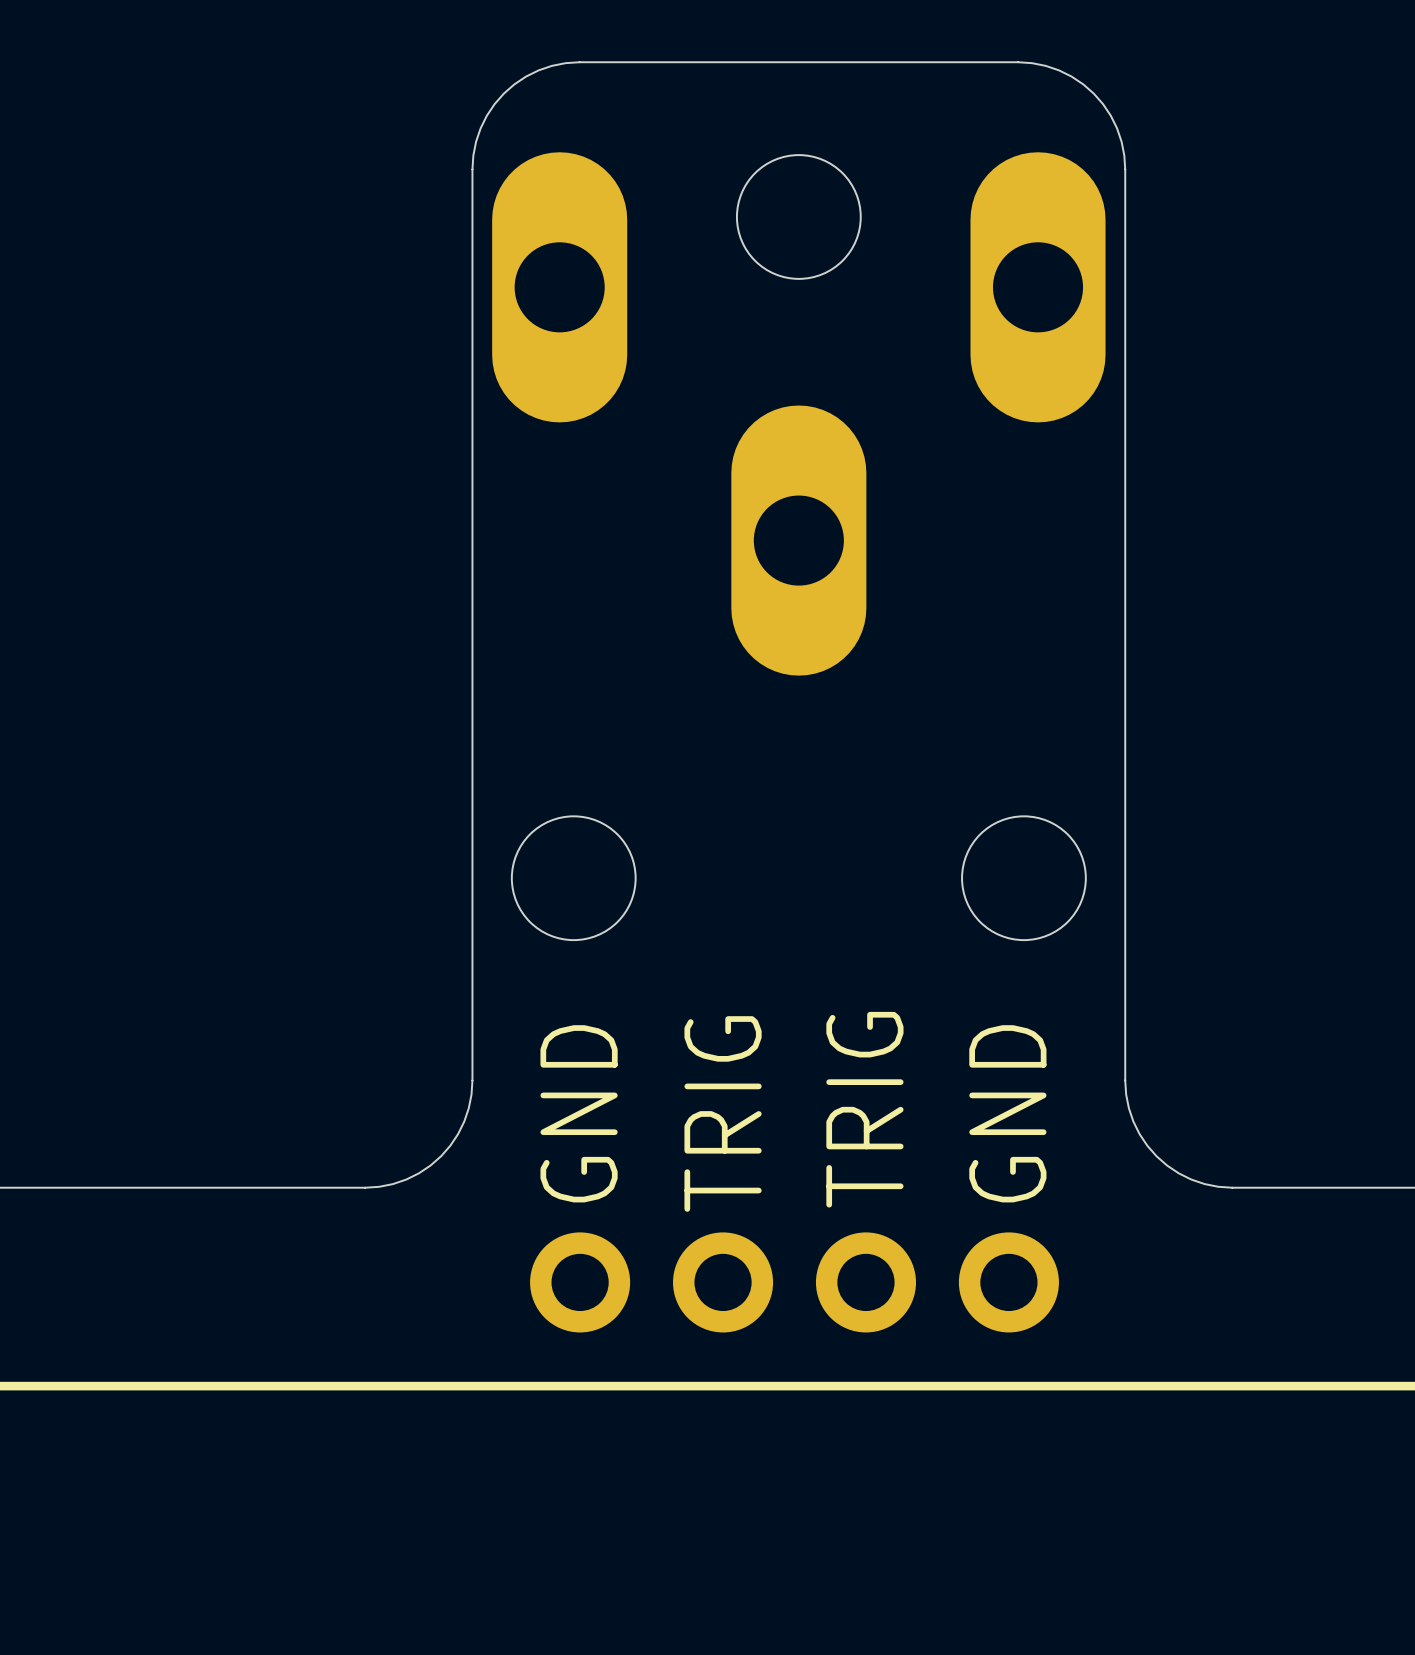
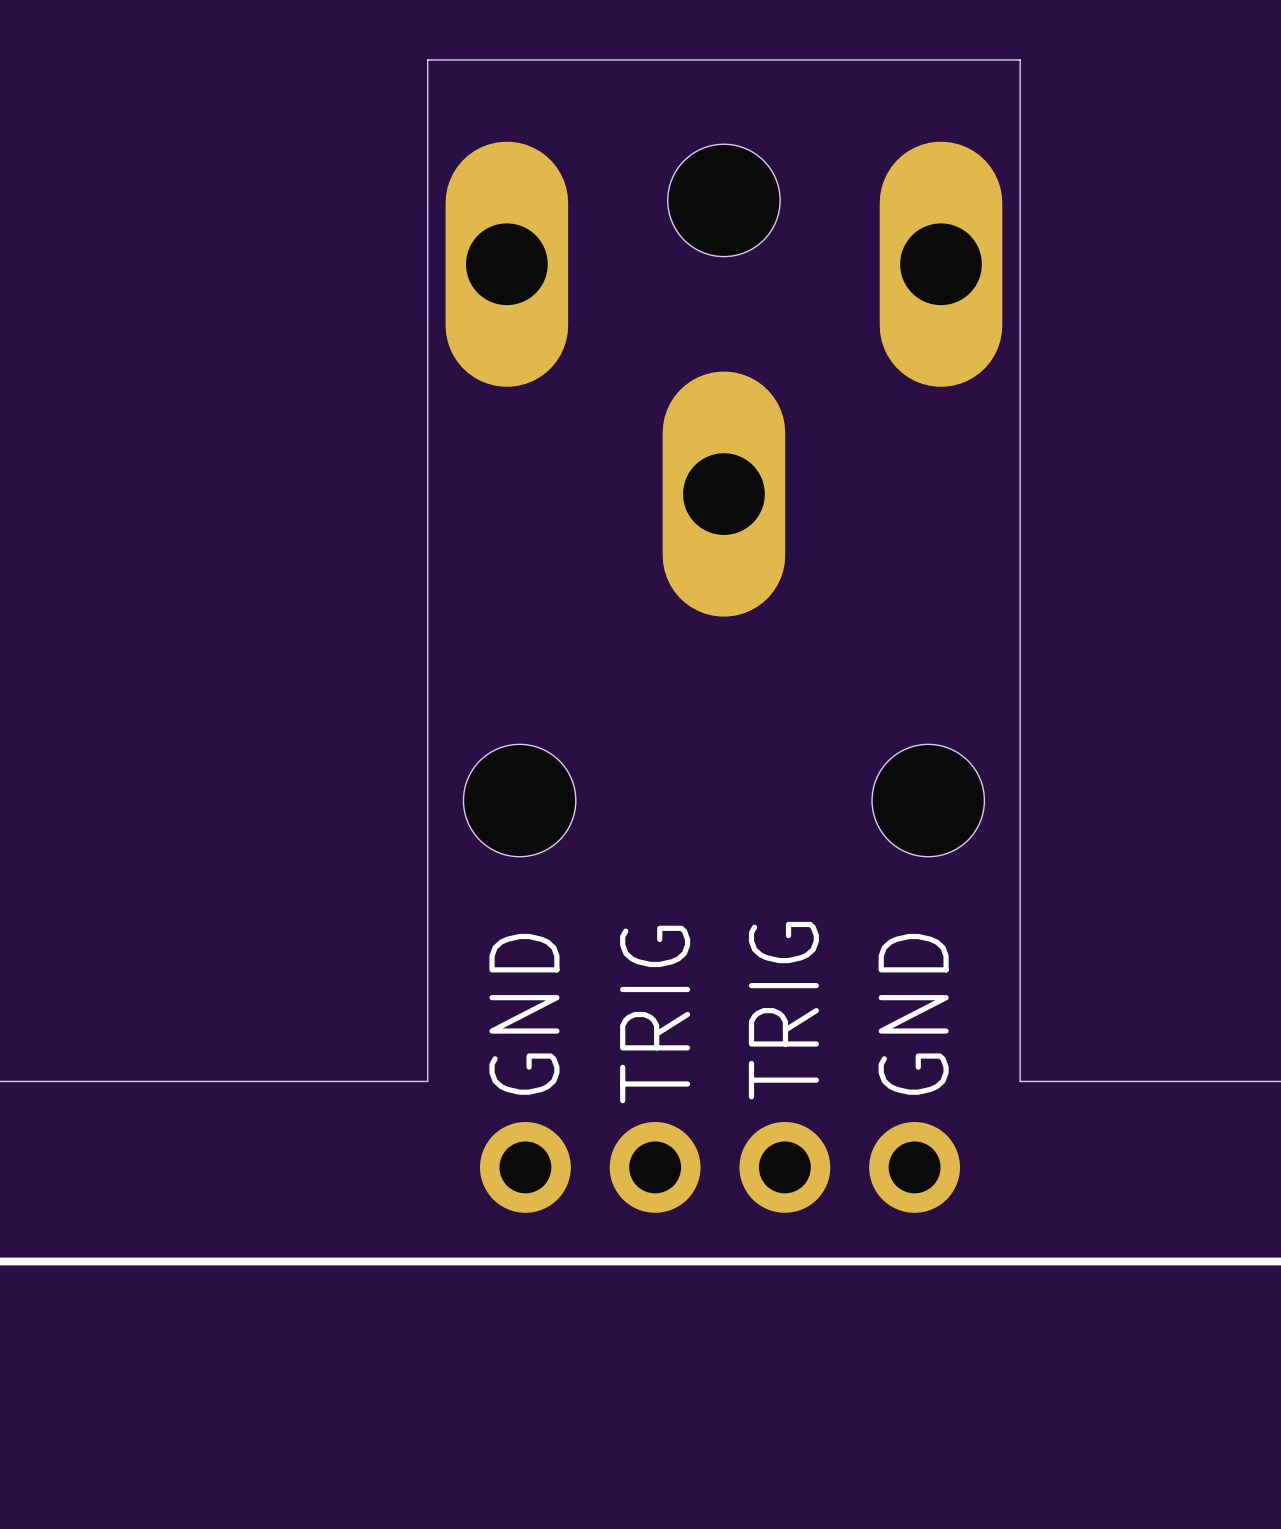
board edge: (579, 62) (551, 65) (538, 70) (526, 76) (503, 93) (486, 115) (480, 128) (476, 141) (472, 169) -> (525, 59) (427, 59) (427, 157)
board edge: (1018, 62) (1045, 65) (1059, 70) (1071, 76) (1093, 93) (1110, 115) (1117, 128) (1121, 141) (1125, 169) -> (922, 59) (1020, 59) (1020, 157)
board edge: (472, 1080) (468, 1108) (464, 1121) (458, 1134) (441, 1156) (418, 1173) (406, 1179) (392, 1184) (365, 1187) -> (427, 984) (427, 1081) (330, 1081)
board edge: (1125, 1080) (1128, 1108) (1133, 1121) (1139, 1134) (1156, 1156) (1178, 1173) (1191, 1179) (1204, 1184) (1232, 1187) -> (1020, 984) (1020, 1081) (1117, 1081)

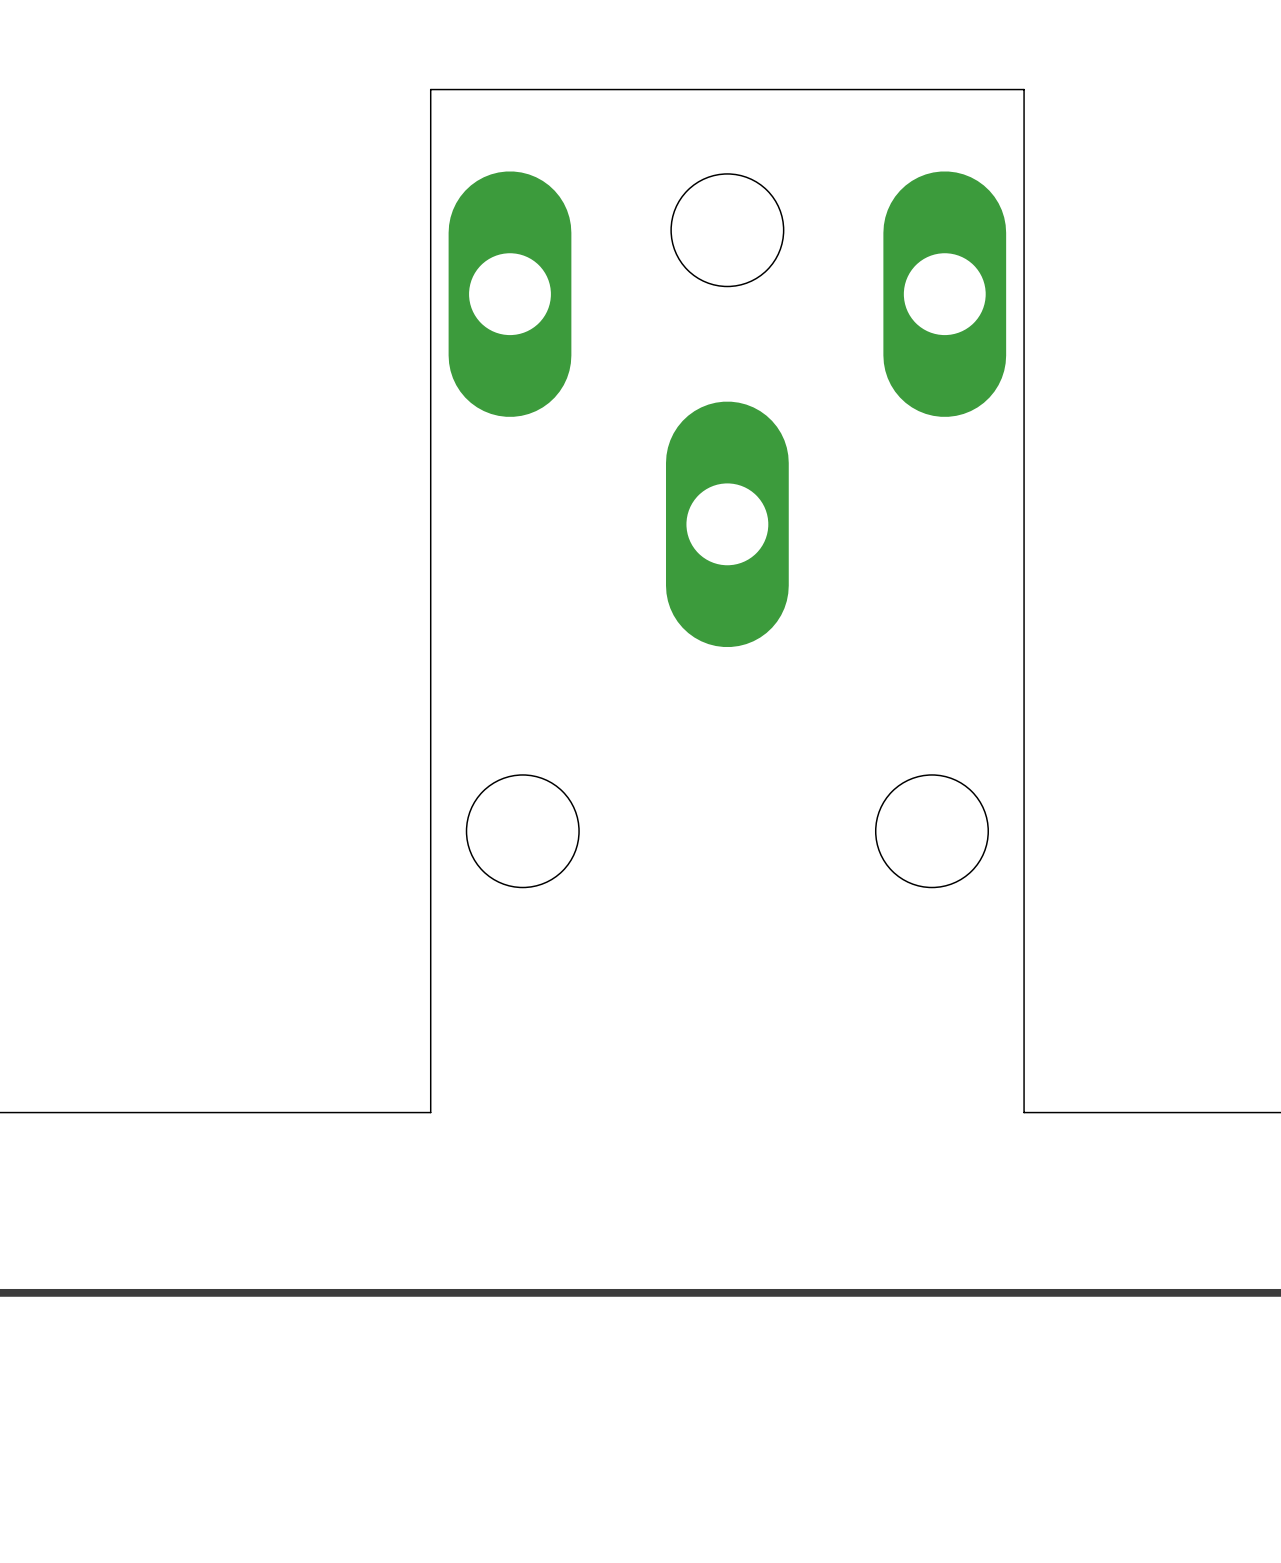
text: TRIG (783, 1010) -> none
text: GND (524, 1014) -> none
text: TRIG (655, 1014) -> none
text: GND (913, 1014) -> none
part: (720, 1167) -> none

